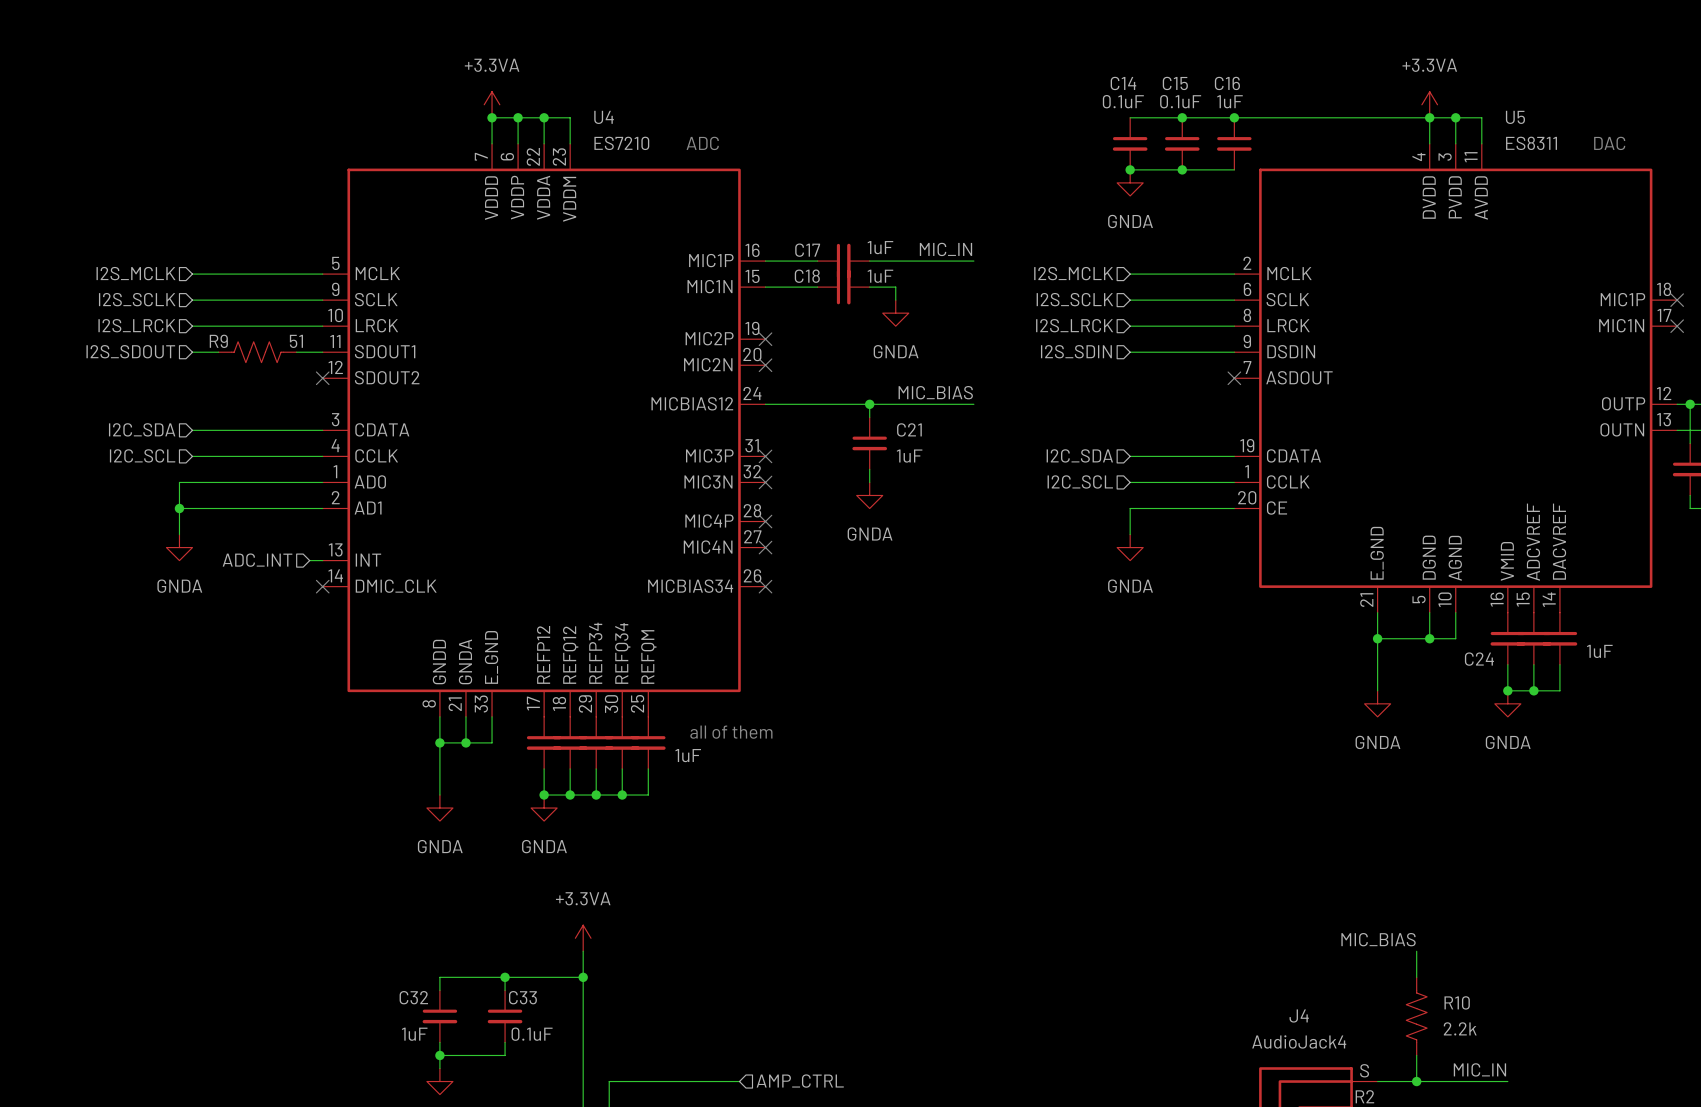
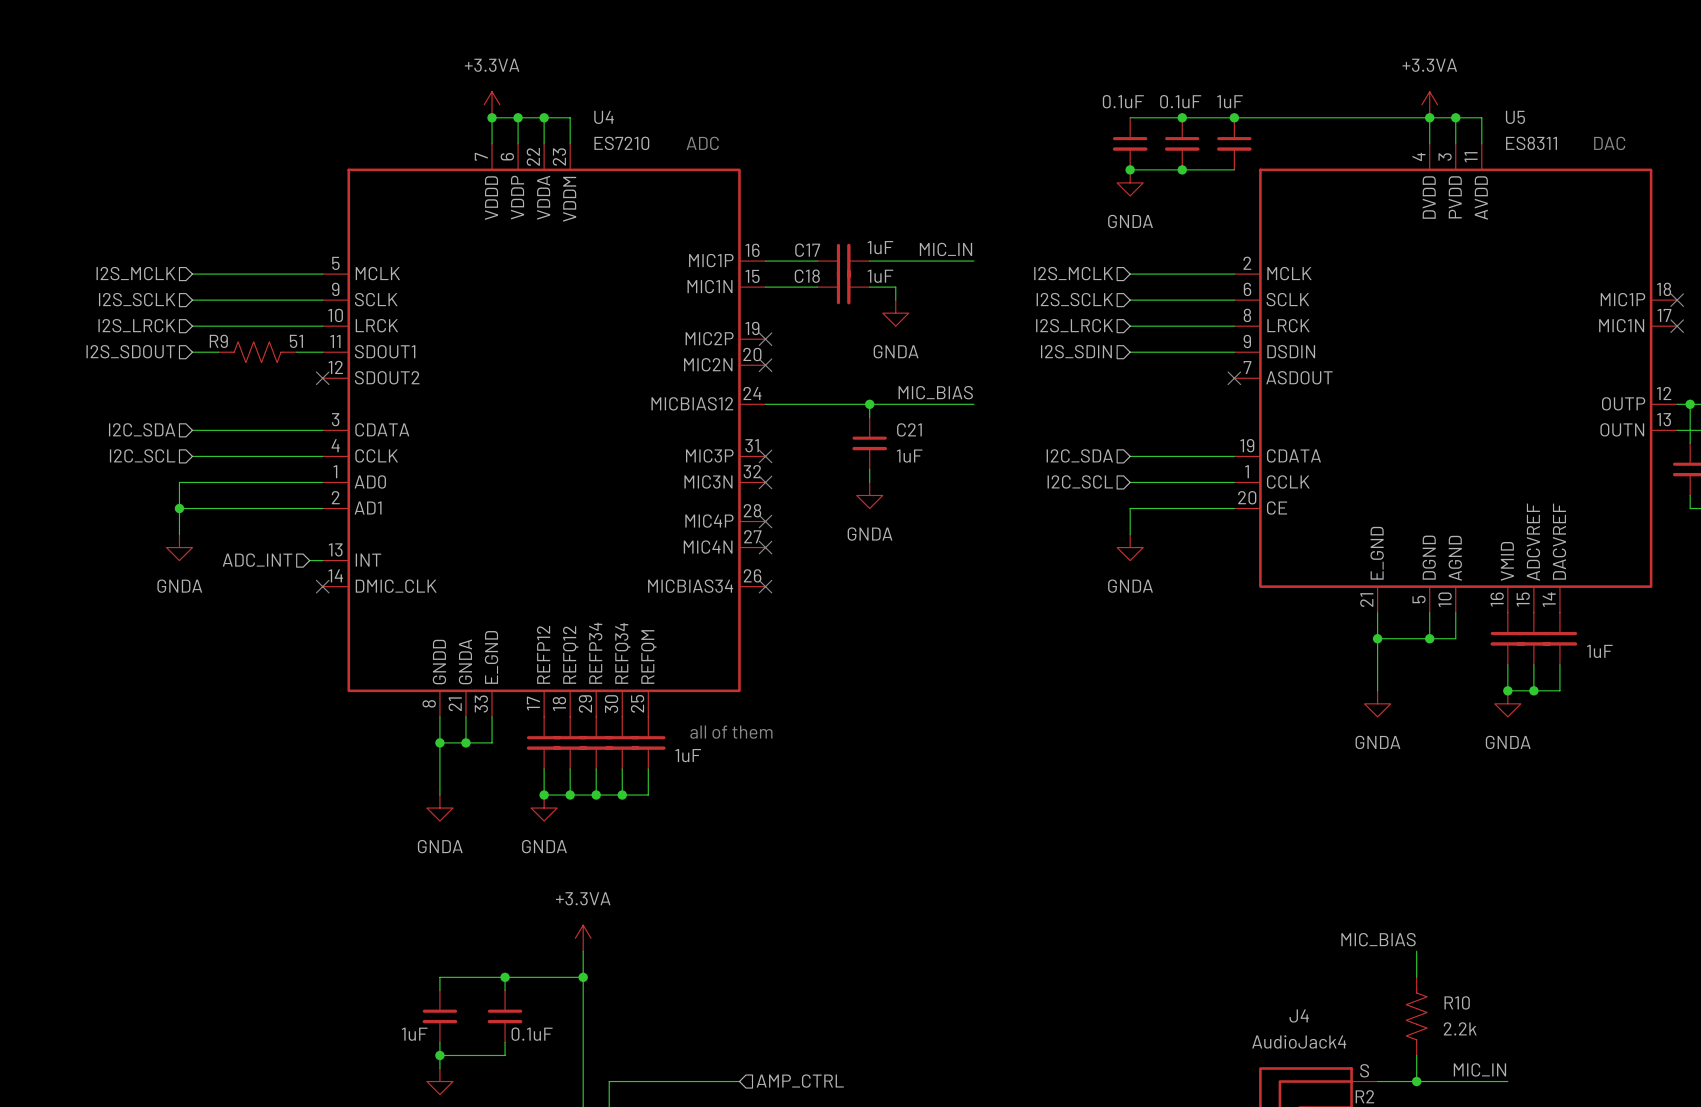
C14 name: C14 (1123, 83) -> none
C15 name: C15 (1175, 83) -> none
C16 name: C16 (1227, 83) -> none
C24 name: C24 (1479, 659) -> none
C32 name: C32 (413, 997) -> none
C33 name: C33 (522, 997) -> none

